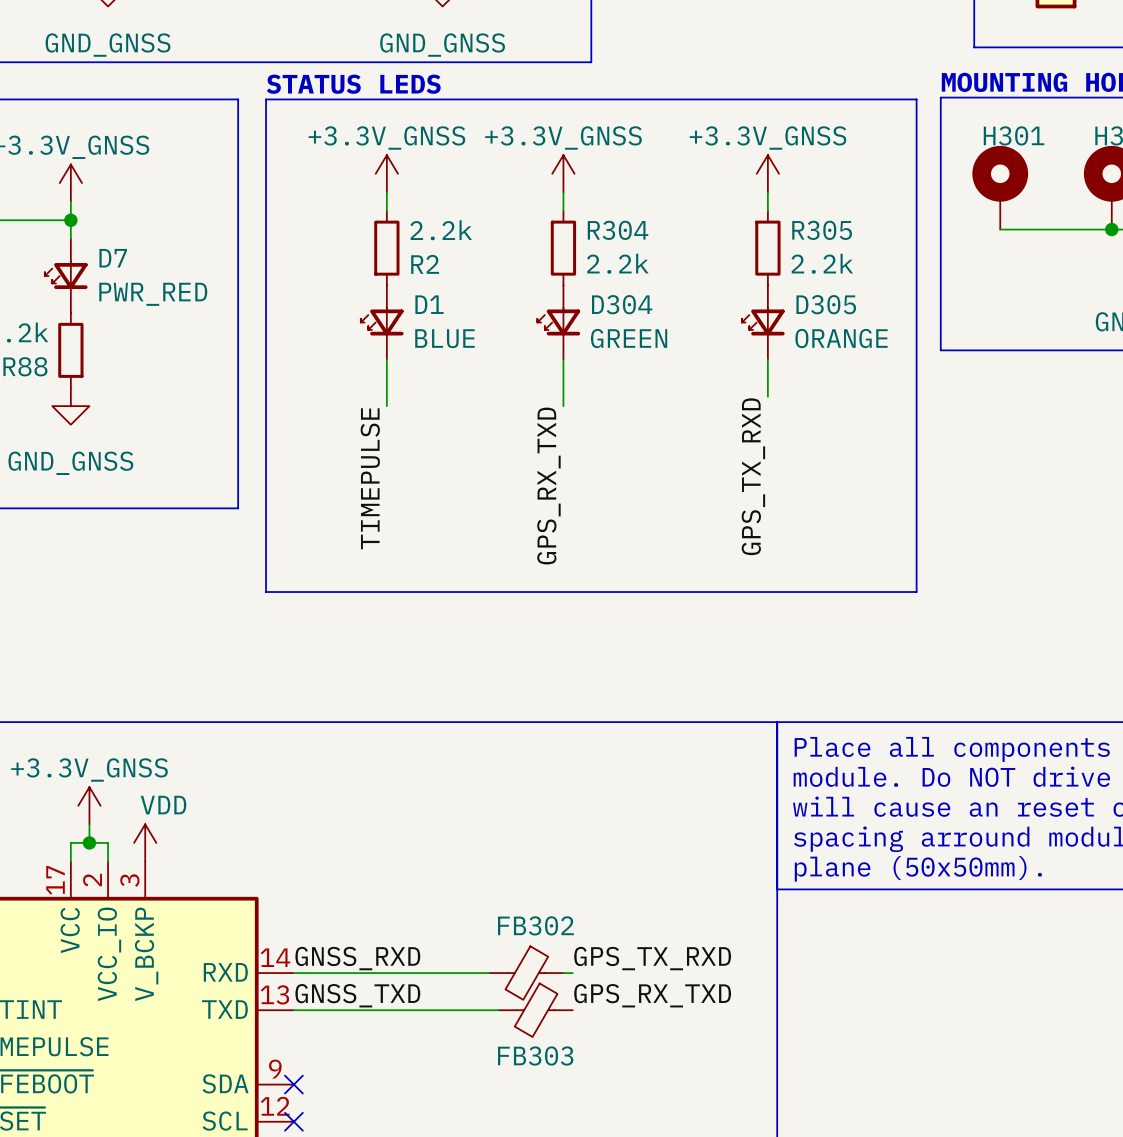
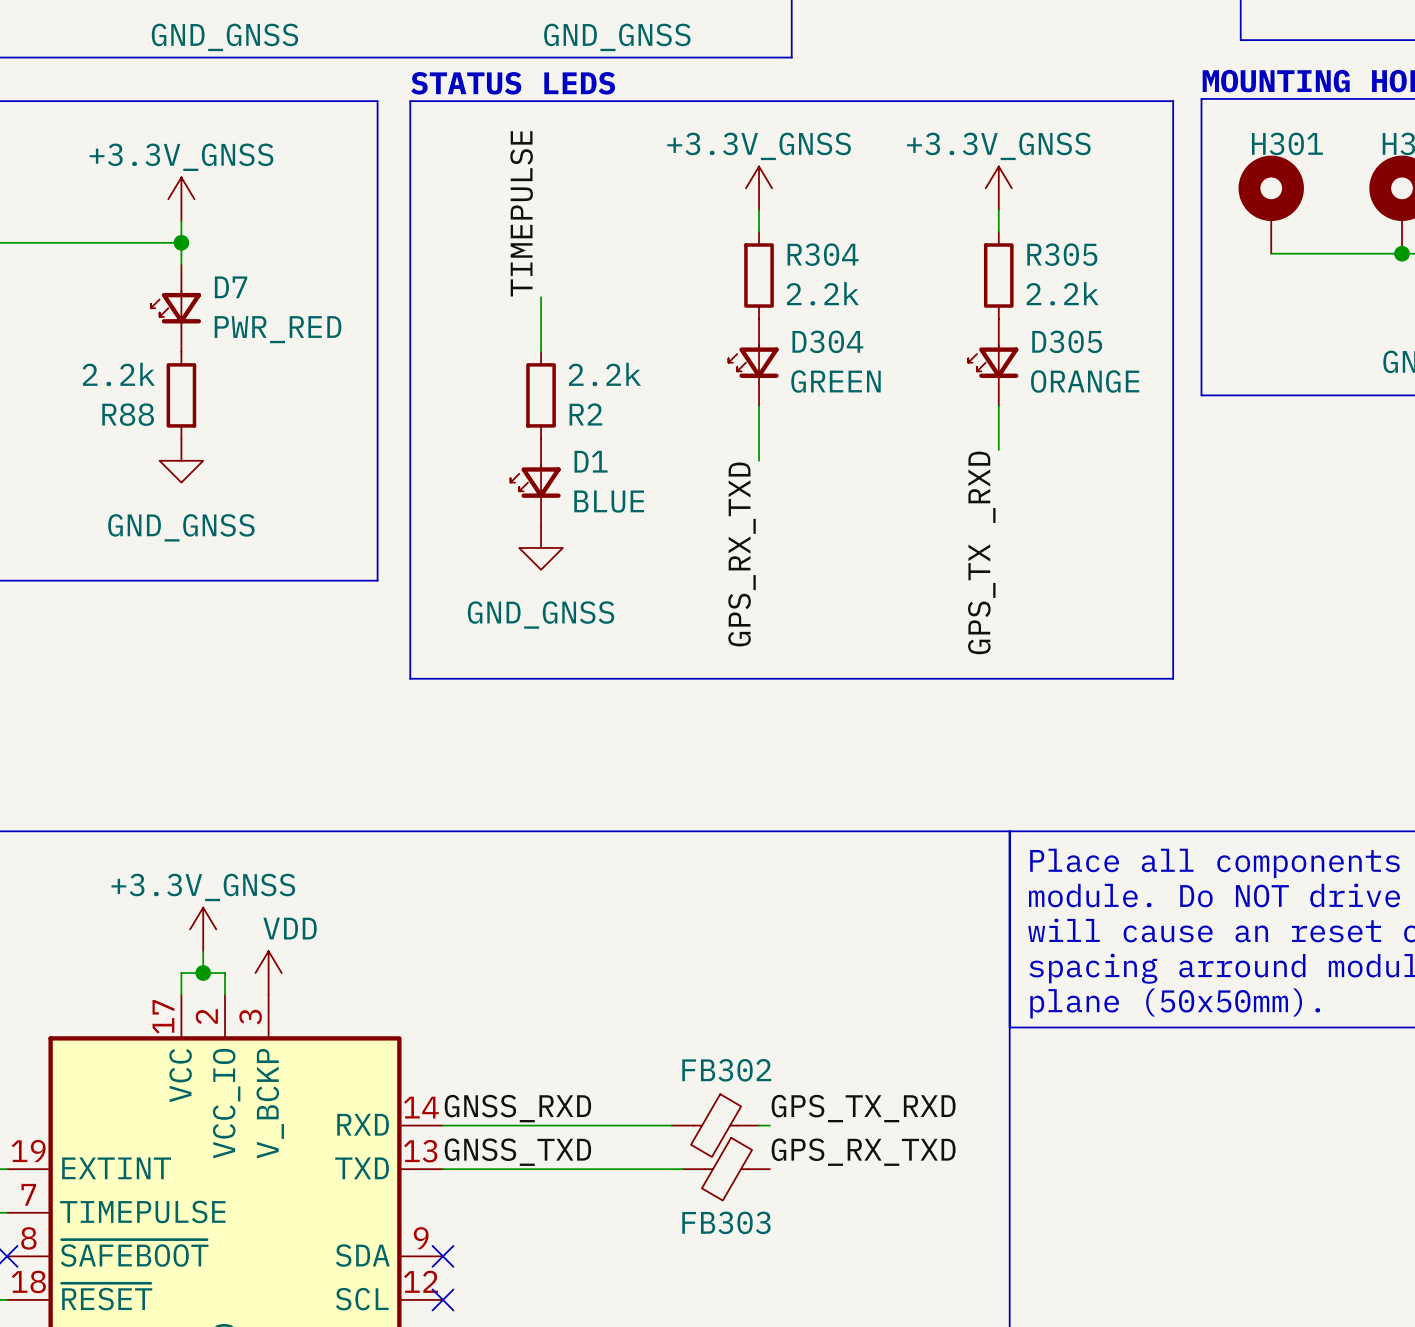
power symbol: +3.3V_GNSS (386, 173) -> none
wire: (386, 192) (386, 210) -> none
R2 position: (386, 248) -> (541, 395)
D1 position: (382, 322) -> (535, 482)
wire: (386, 359) (386, 406) -> (541, 297) (541, 351)
label: GPS_TX_RXD (753, 476) -> GPS_TX _RXD (981, 552)
label position: TIMEPULSE (370, 478) -> TIMEPULSE (521, 213)
power symbol: none -> GND_GNSS (541, 547)

